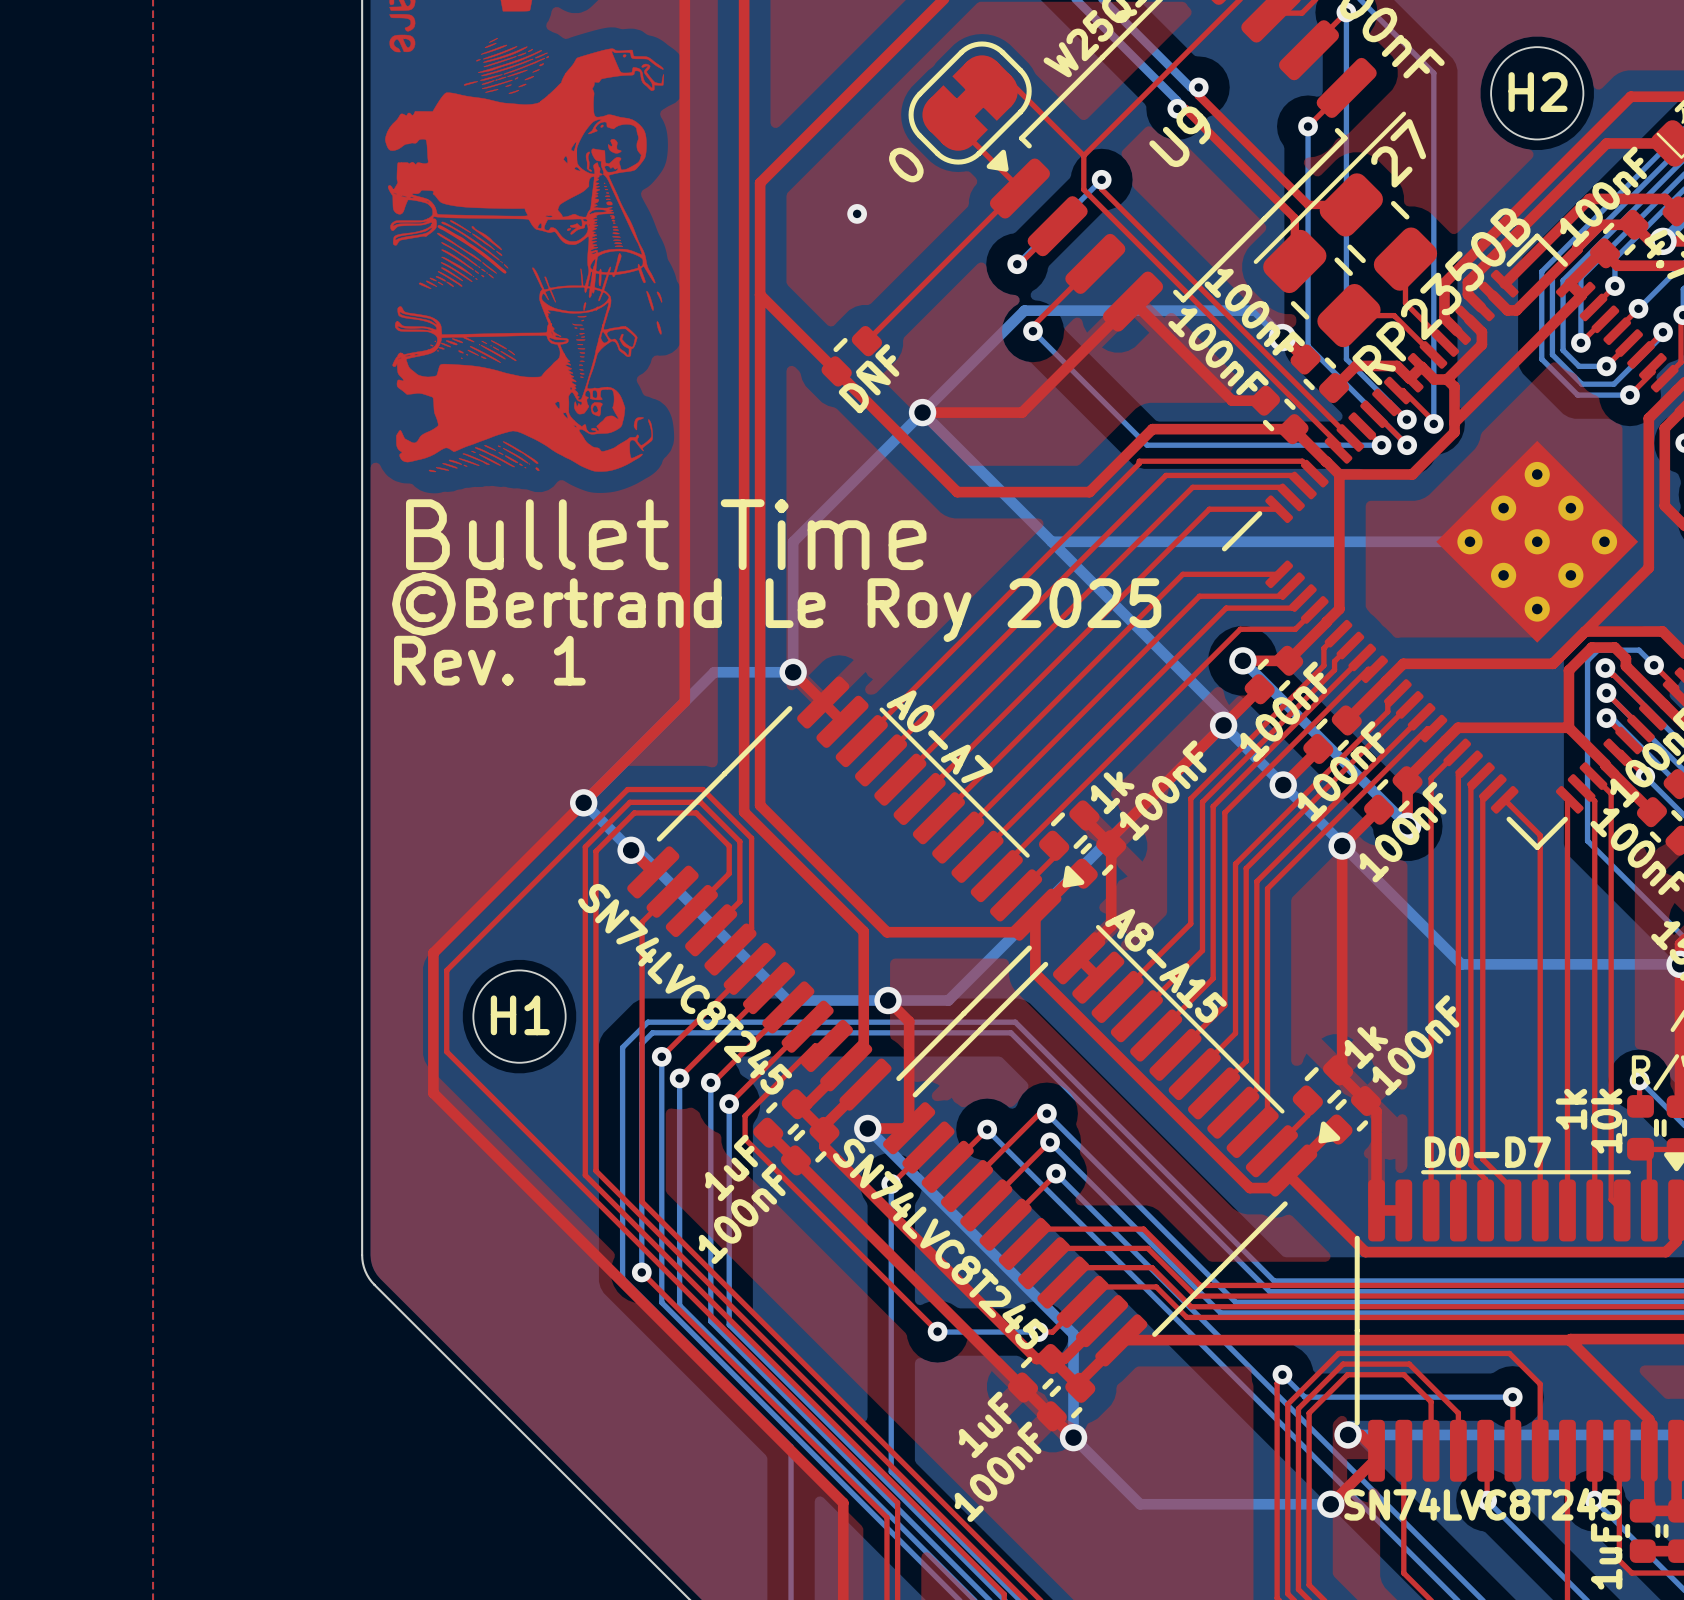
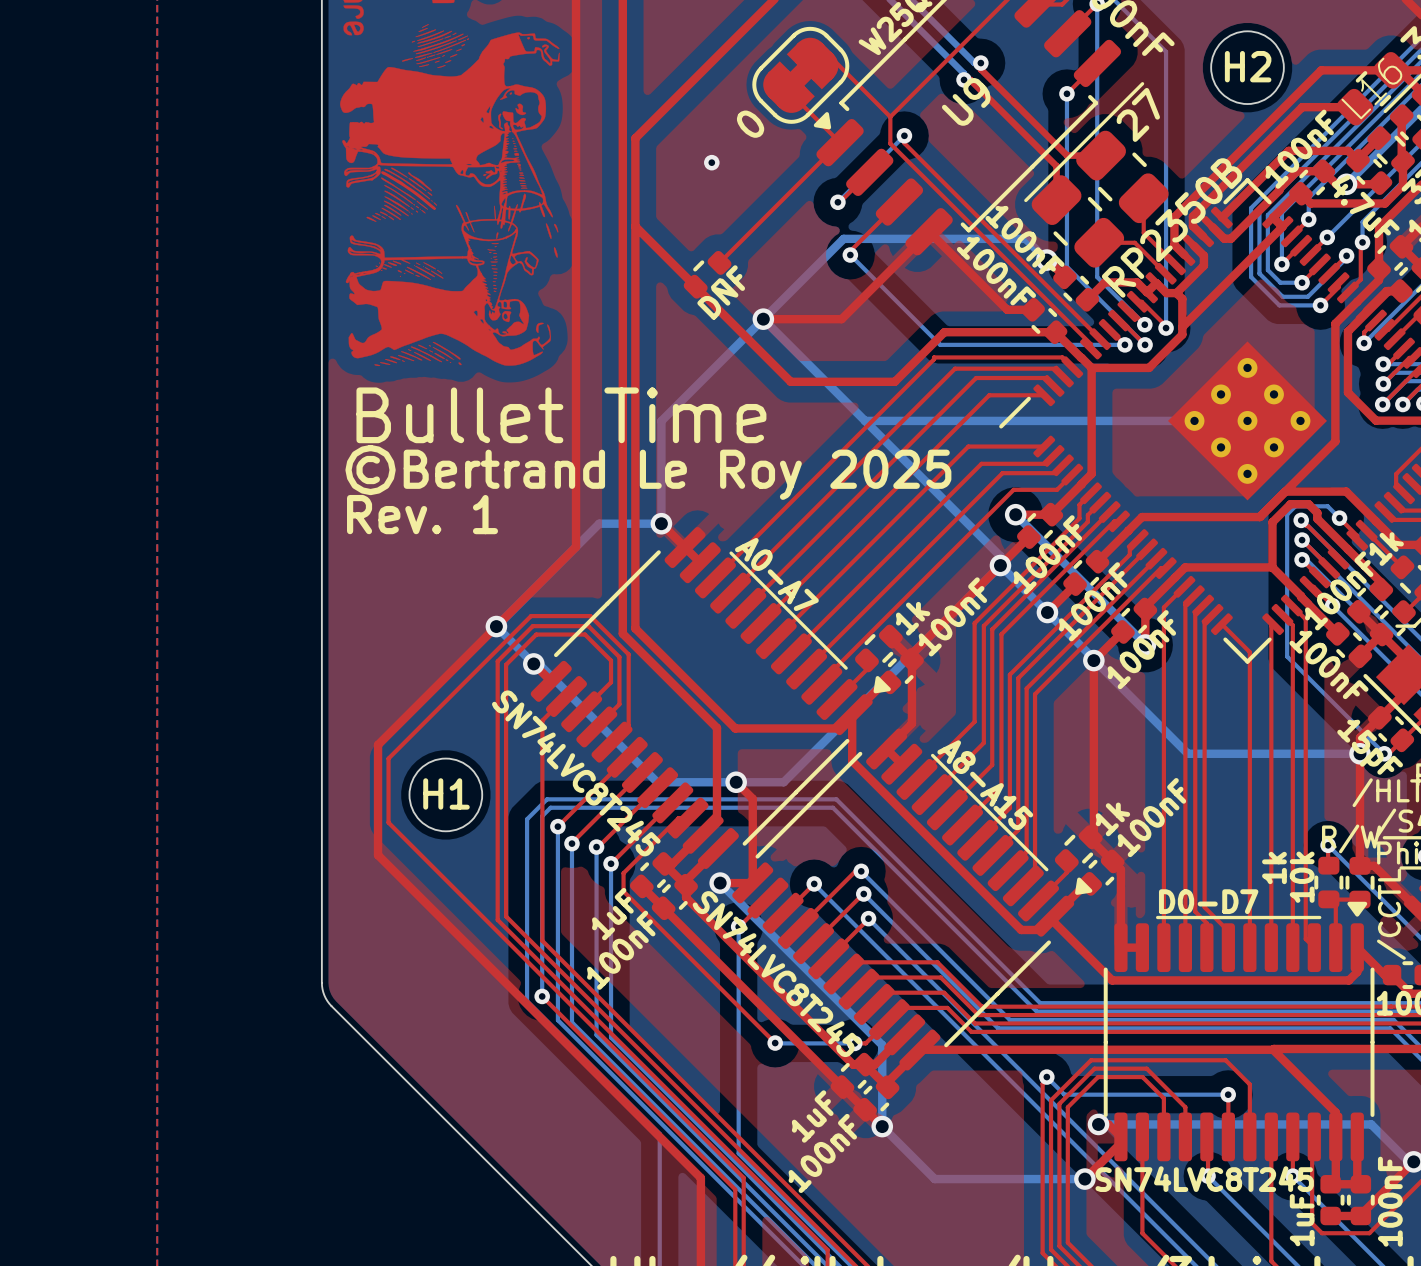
line: (1098, 927) (1137, 966) -> none
part text position: A8-A15 (1165, 965) -> A8-A15 (985, 785)

